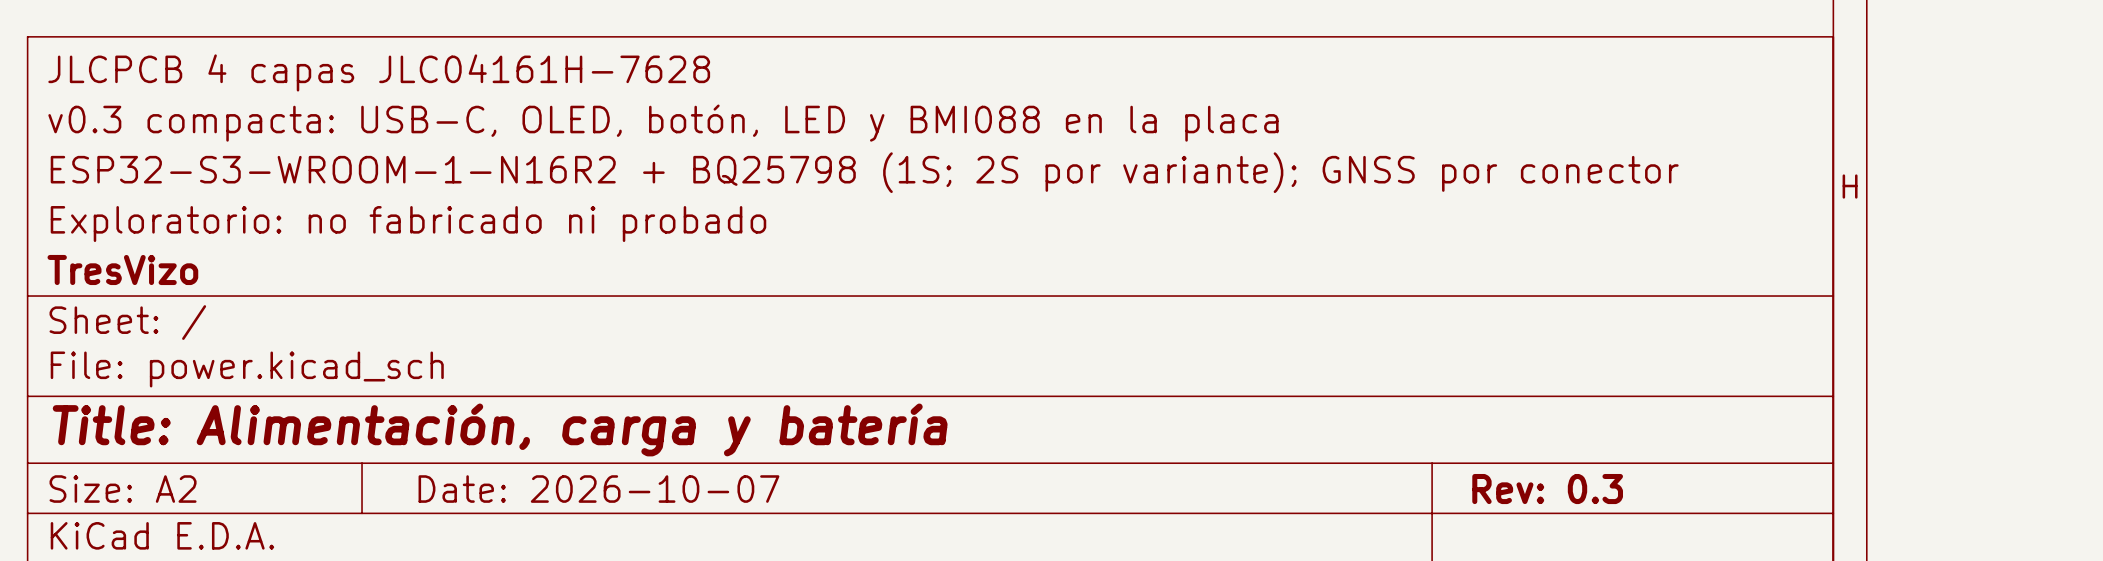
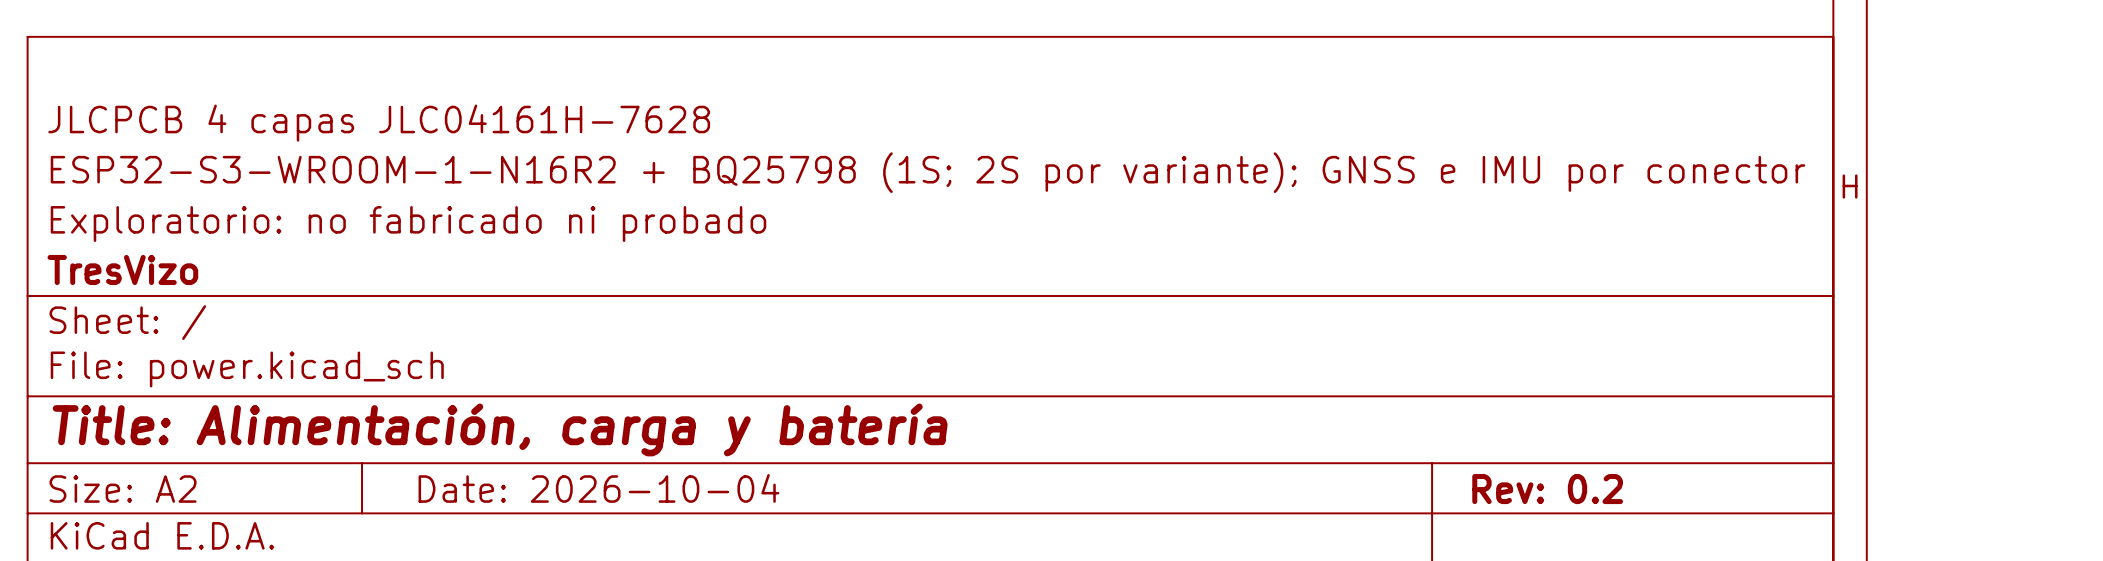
title block: JLCPCB 4 capas JLC04161H-7628 (379, 72) -> none
title block: v0.3 compacta: USB-C, OLED, botón, LED y BMI088 en la placa (663, 123) -> JLCPCB 4 capas JLC04161H-7628 (379, 123)
title block: ESP32-S3-WROOM-1-N16R2 + BQ25798 (1S; 2S por variante); GNSS por conector (864, 172) -> ESP32-S3-WROOM-1-N16R2 + BQ25798 (1S; 2S por variante); GNSS e IMU por conector (927, 172)
title block: Date: 2026-10-07 (598, 489) -> Date: 2026-10-04 (598, 488)
title block: Rev: 0.3 (1547, 489) -> Rev: 0.2 (1547, 489)

